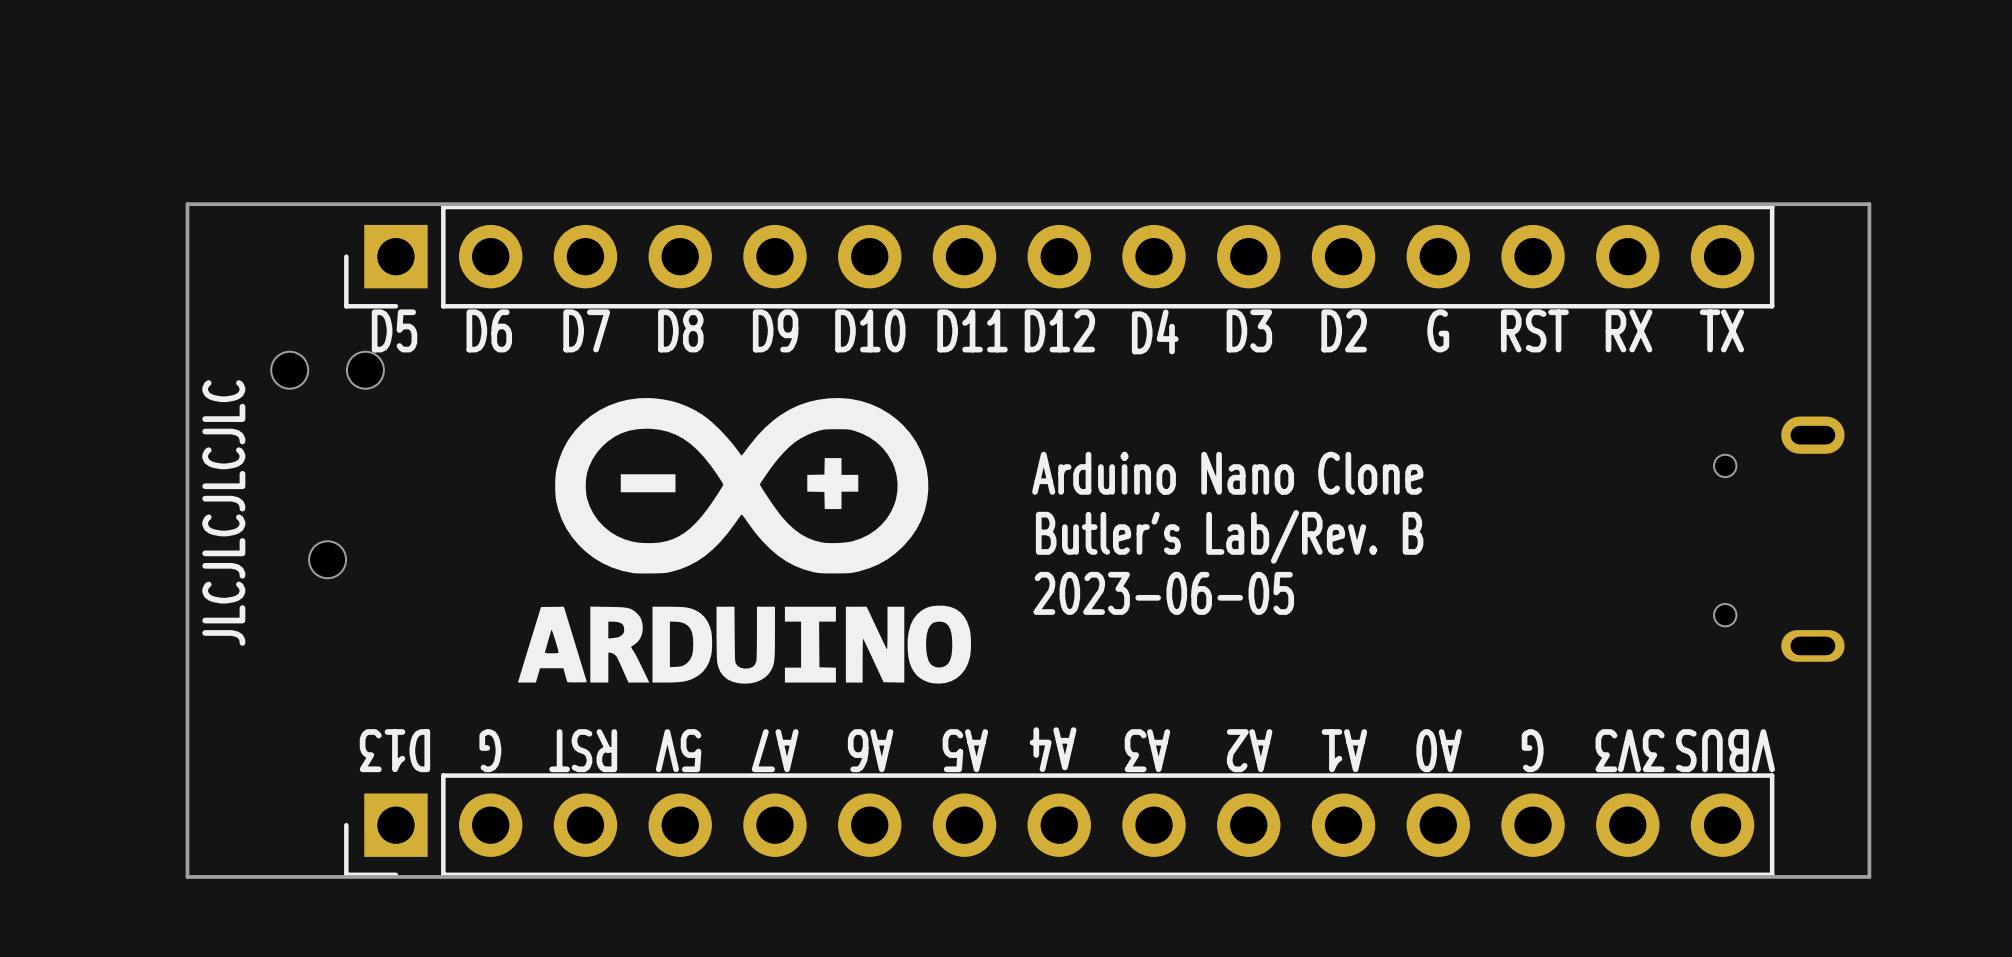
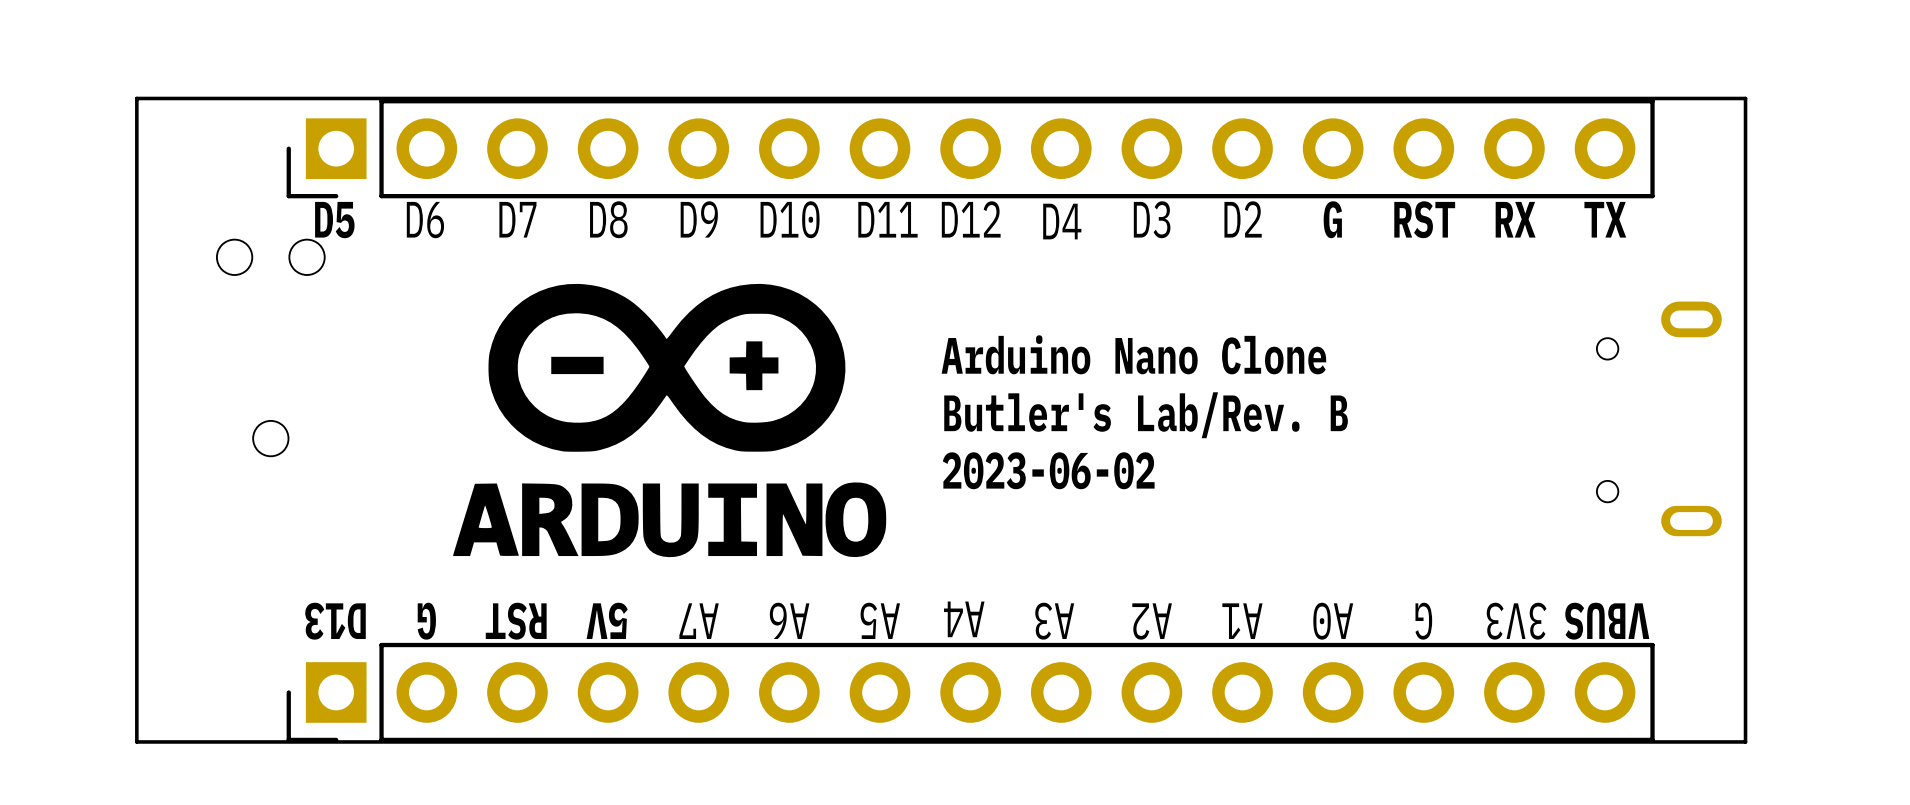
text: JLCJLCJLCJLC (223, 512) -> none
text: 2023-06-05 (1163, 593) -> 2023-06-02 (1048, 470)

